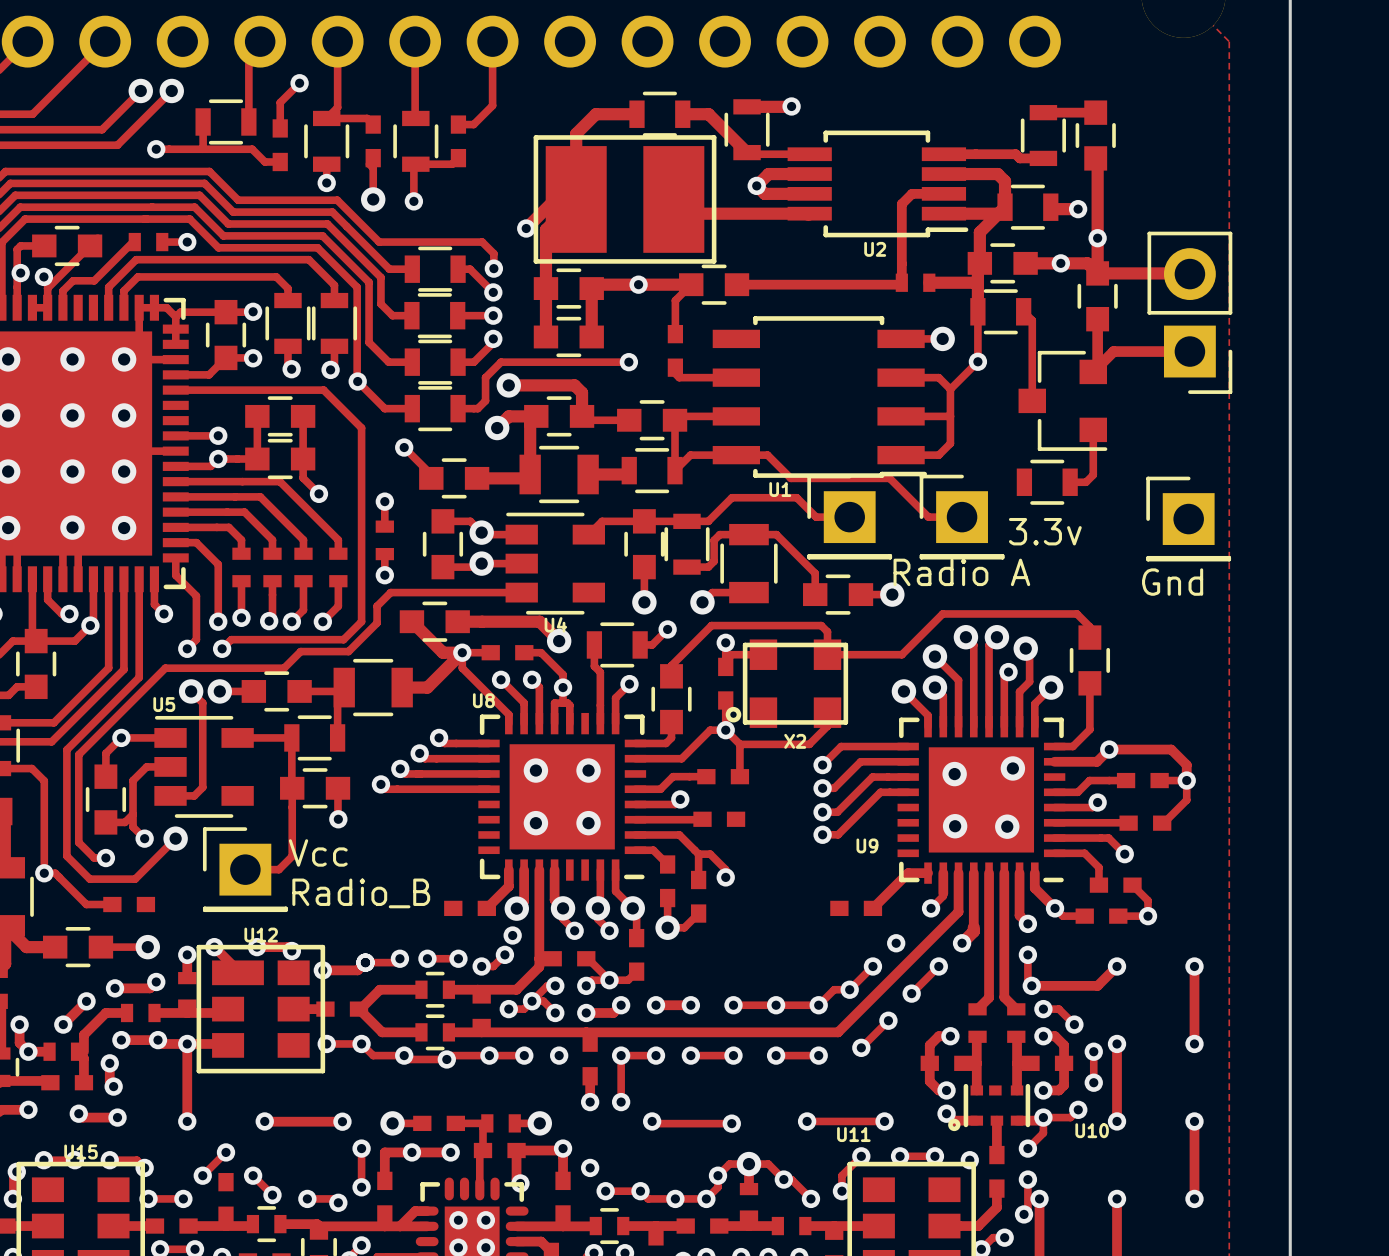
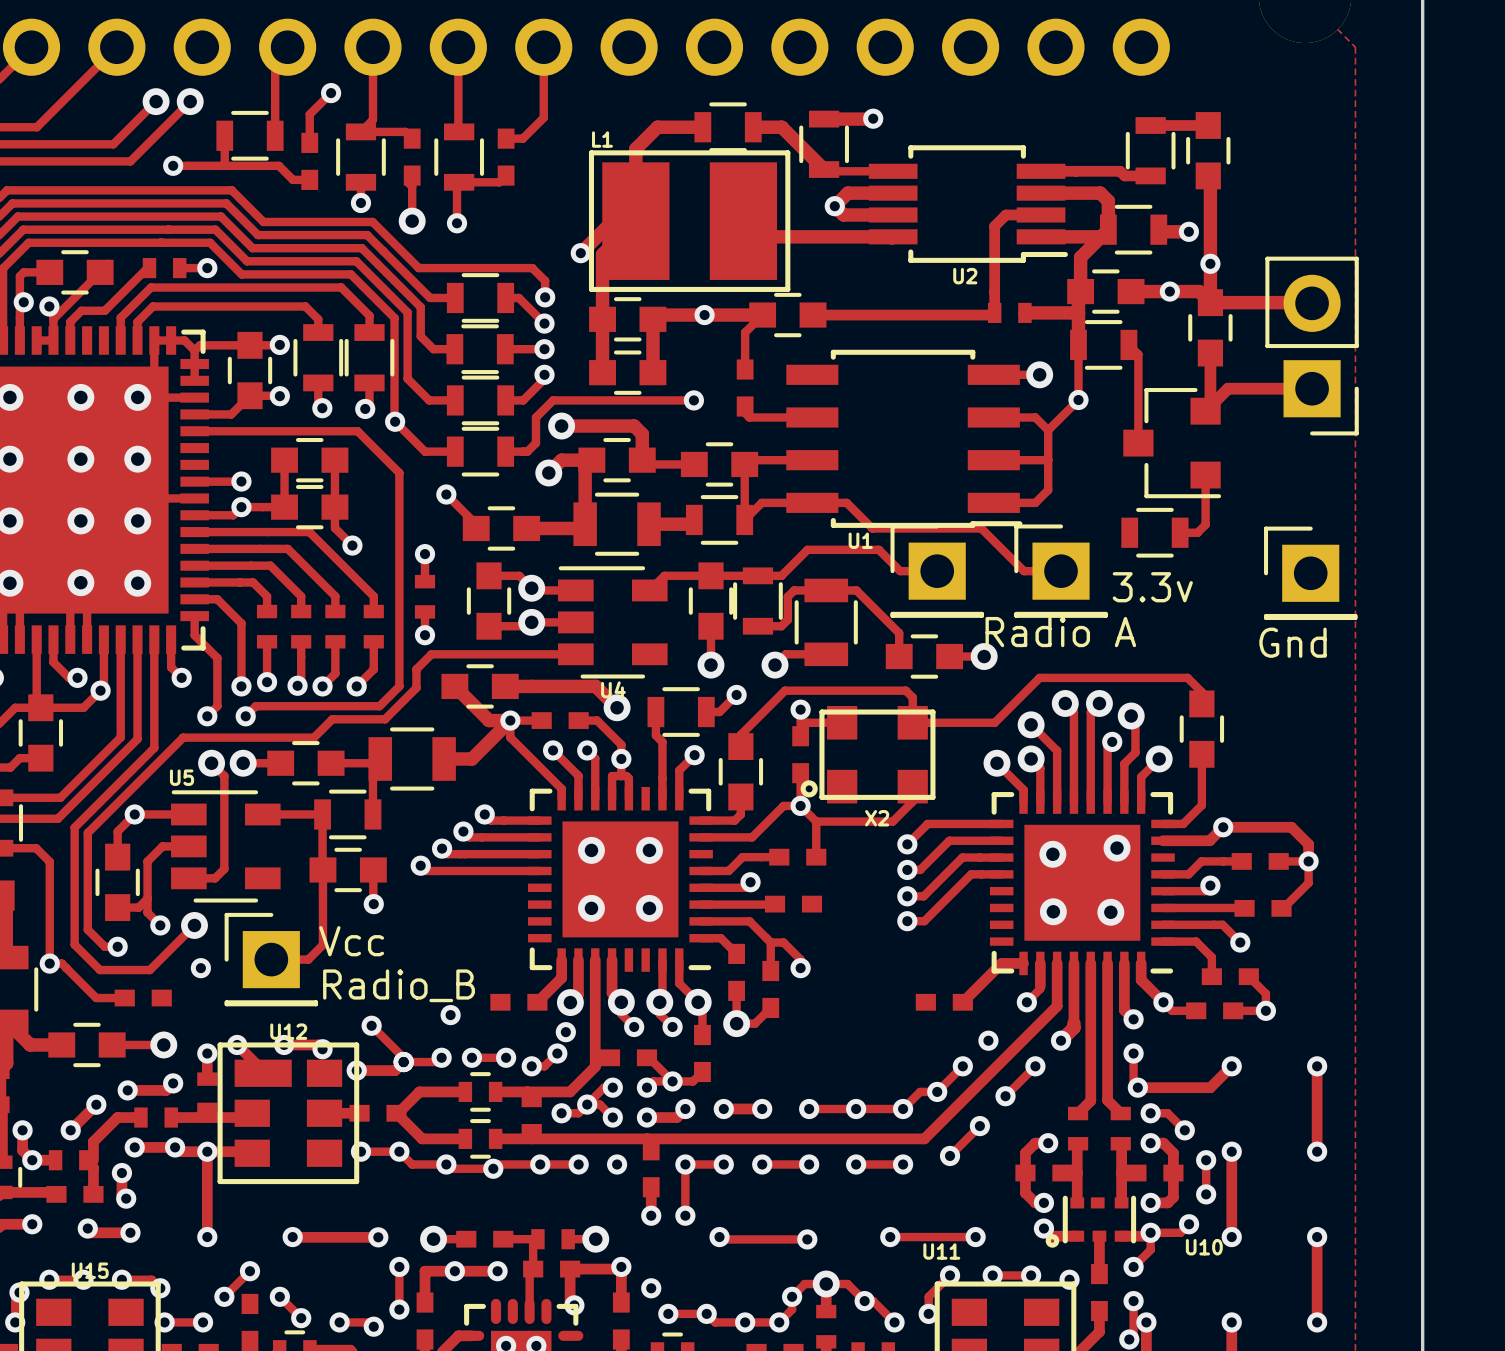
L1 name: none -> L1 (602, 139)
U8 name: U8 (483, 700) -> none
U9 name: U9 (867, 845) -> none
via: none -> (200, 968)
via: none -> (450, 1015)
track: none -> (371, 1025) (403, 1057) (403, 1062)
via: none -> (371, 1025)

